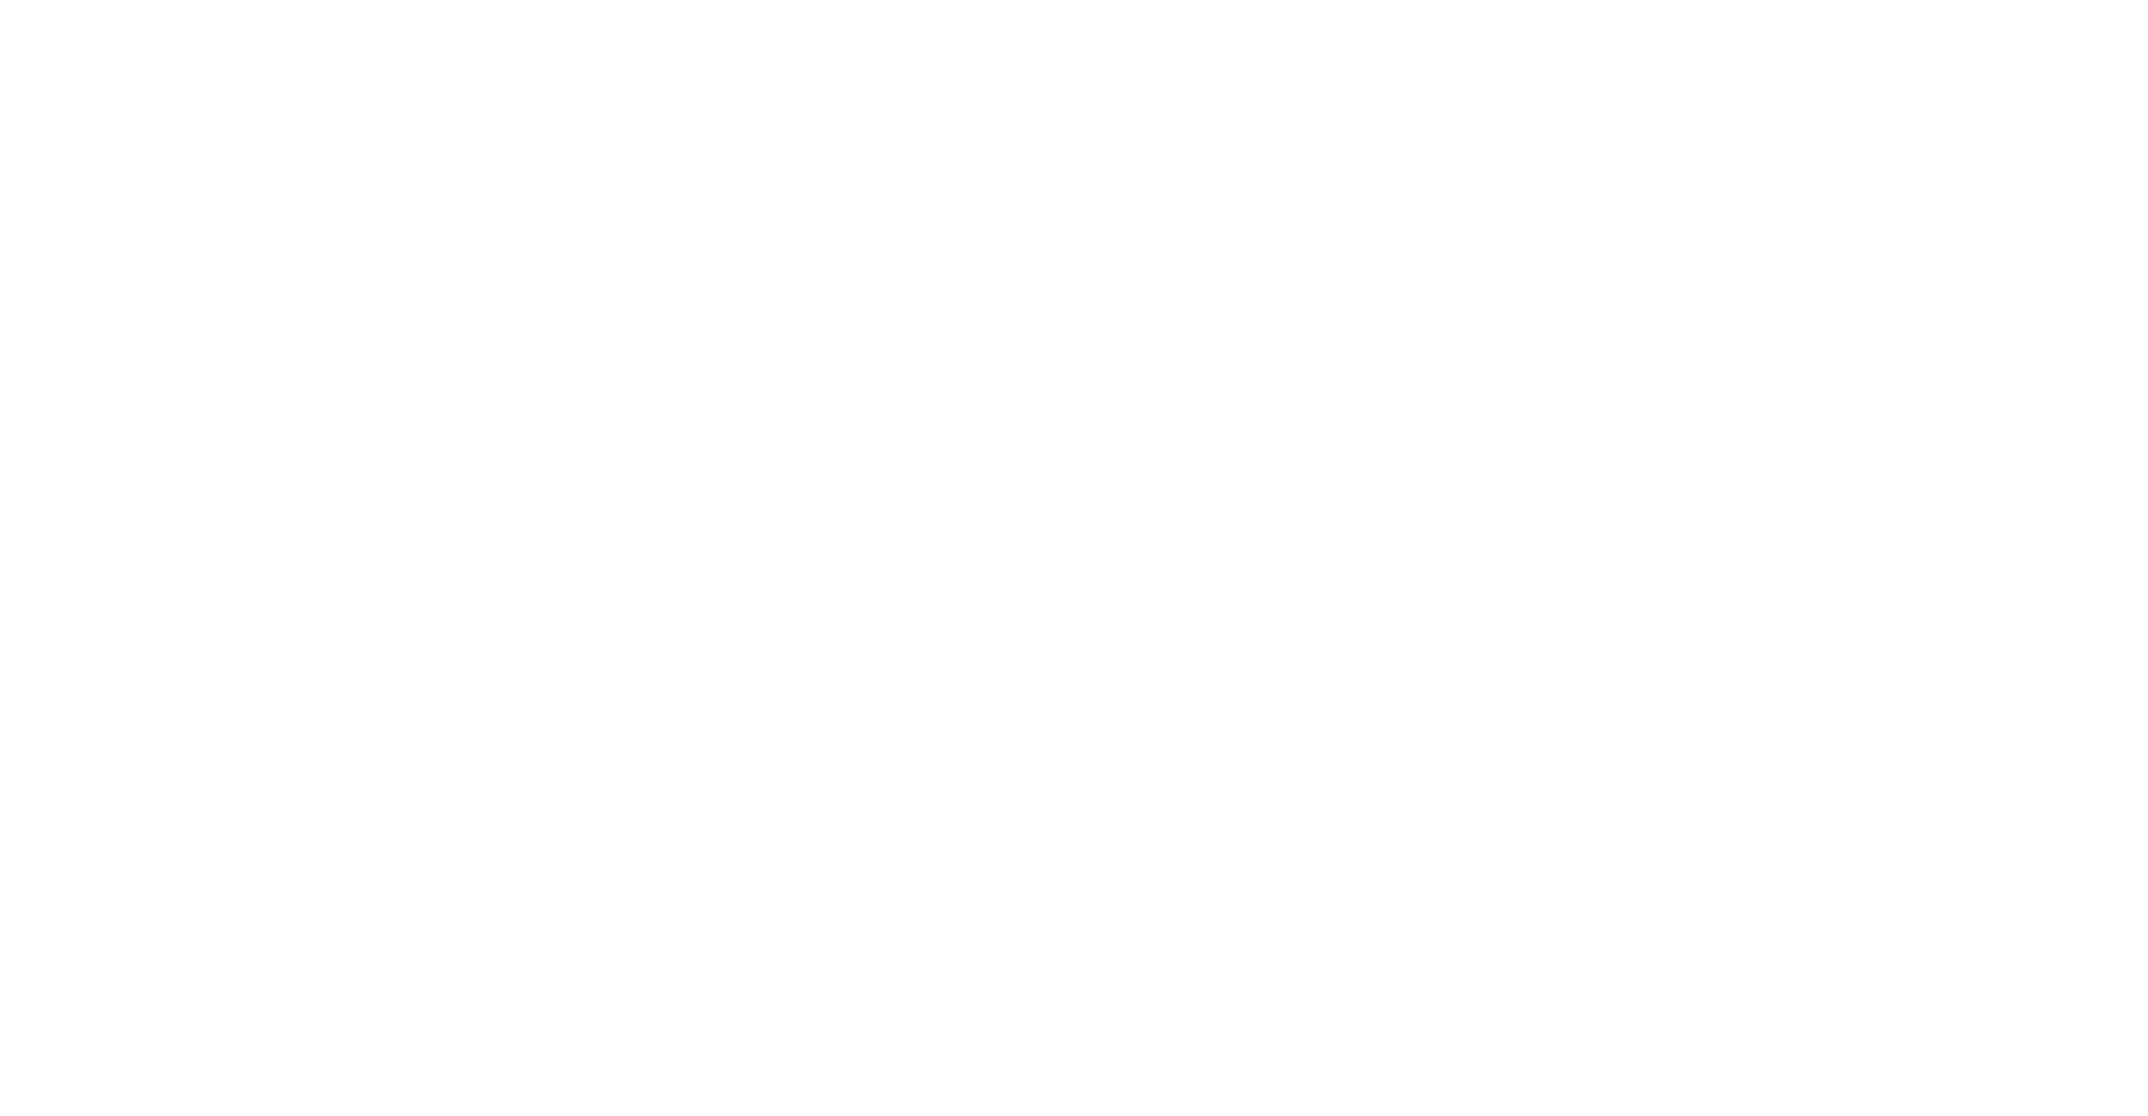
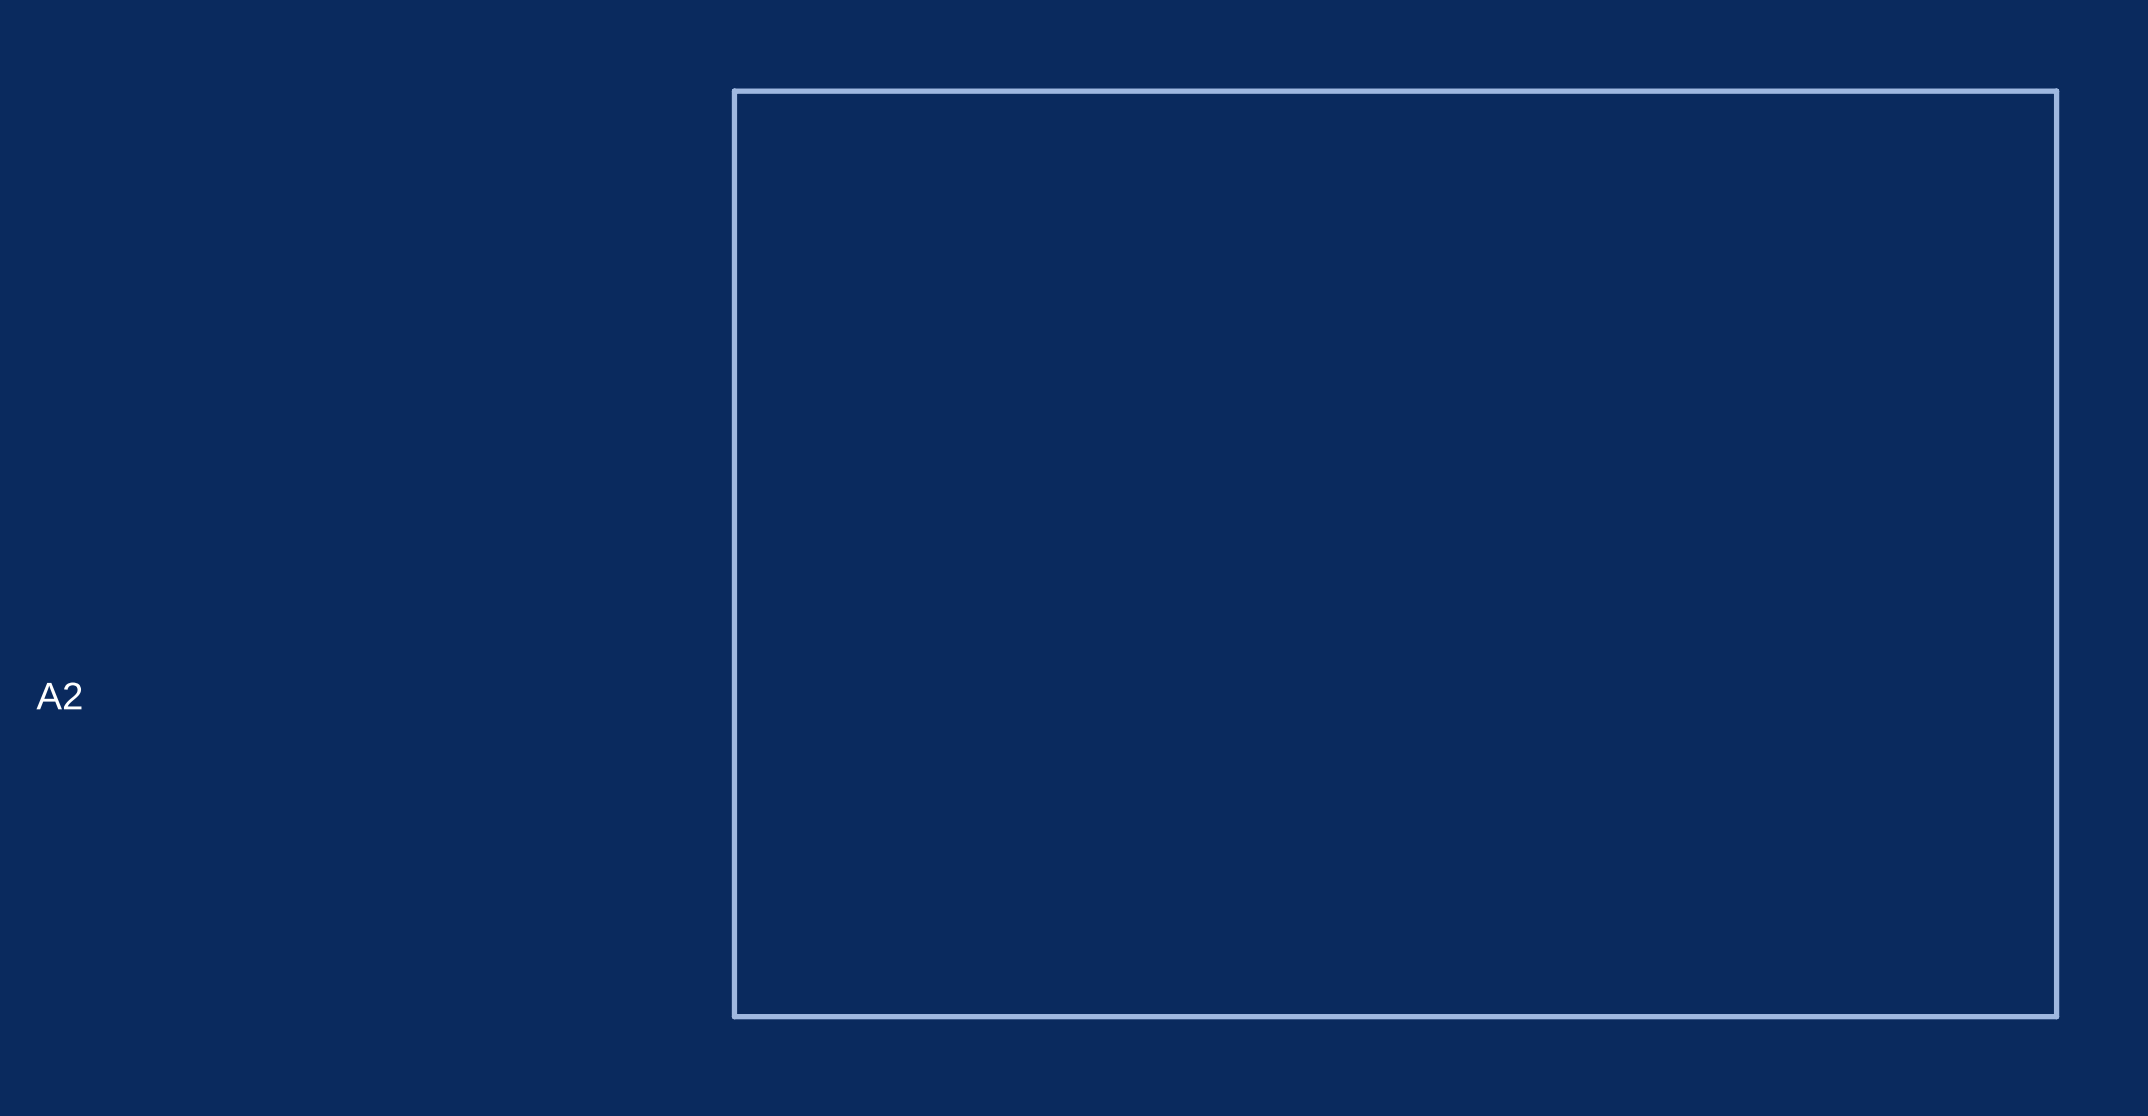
line: none -> (734, 91) (2056, 91) (2056, 1016) (734, 1016) (734, 91)
text: none -> A2 (58, 695)

